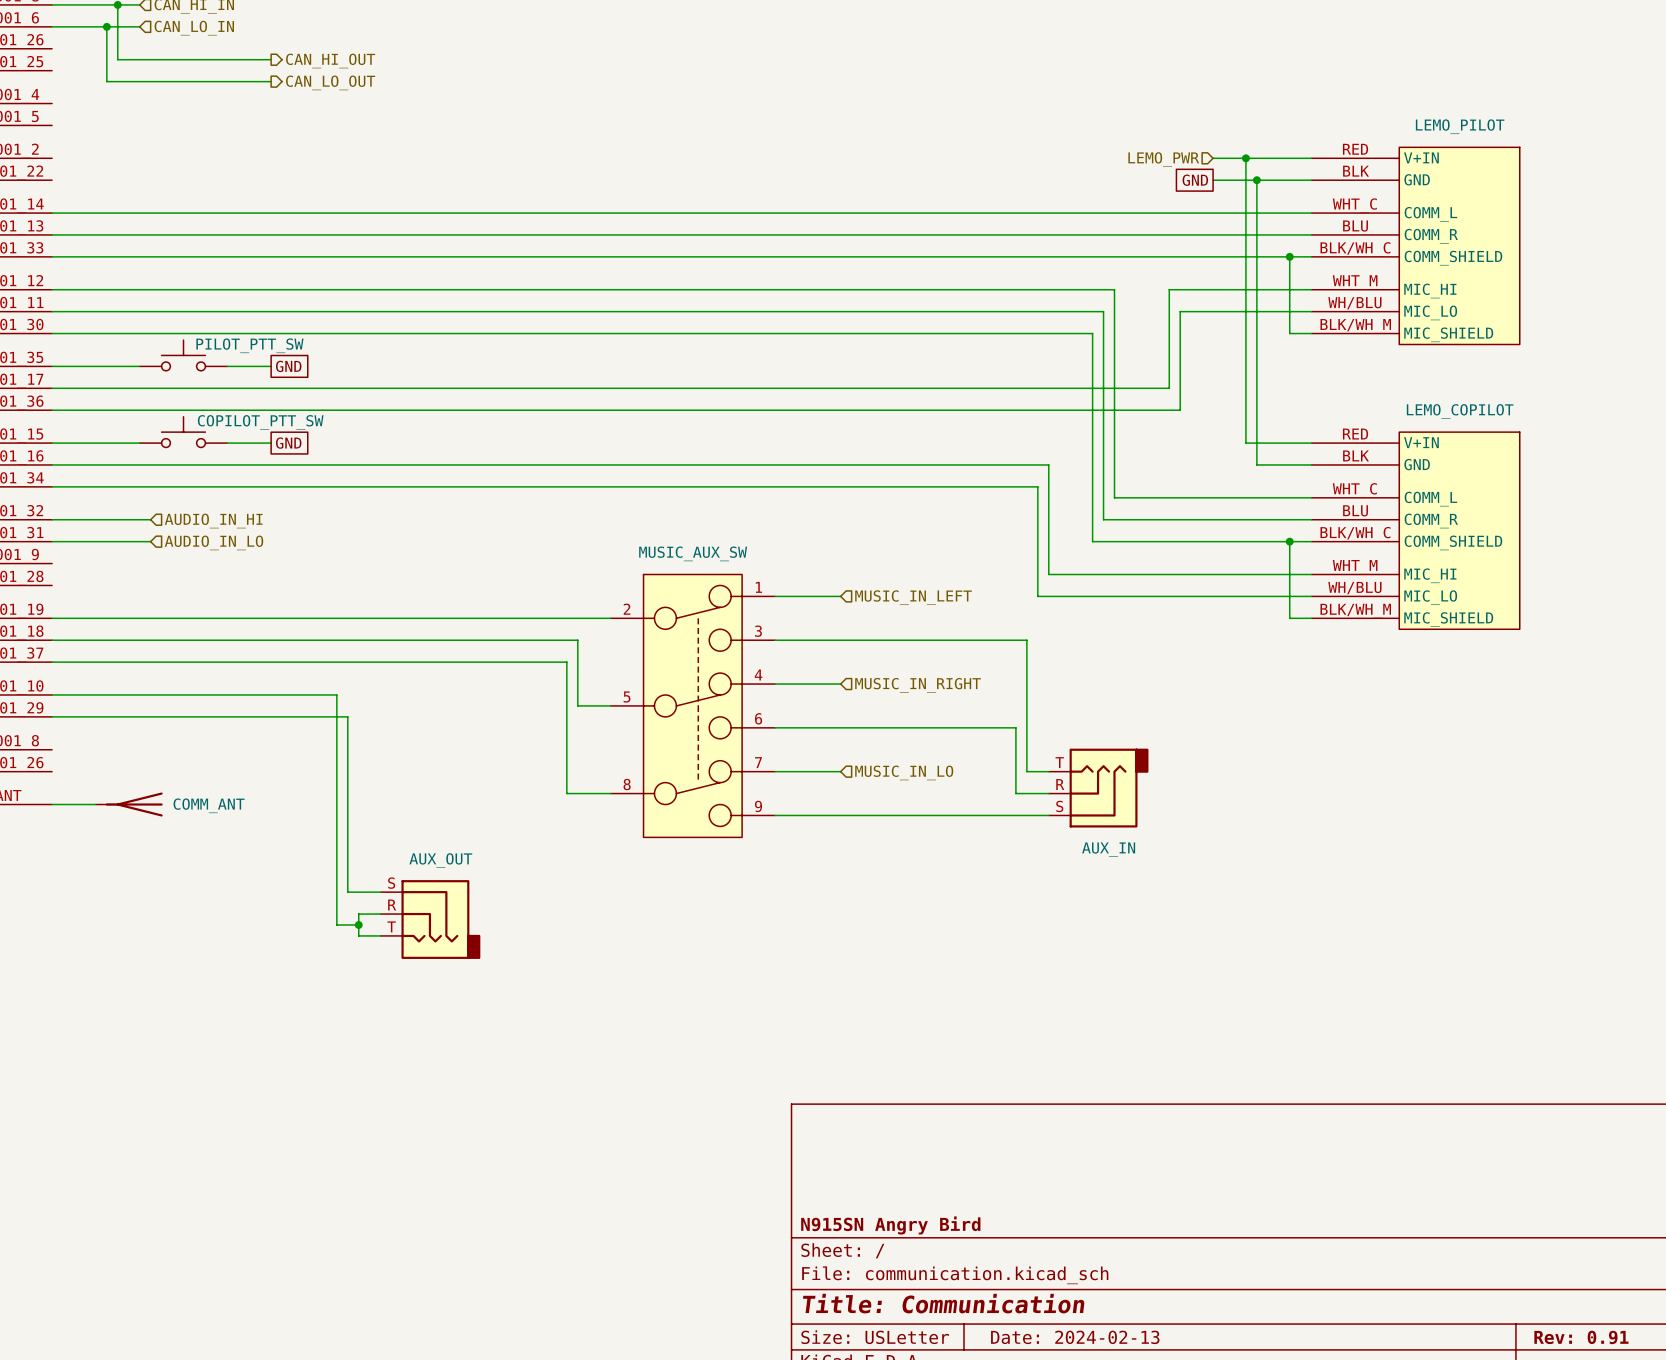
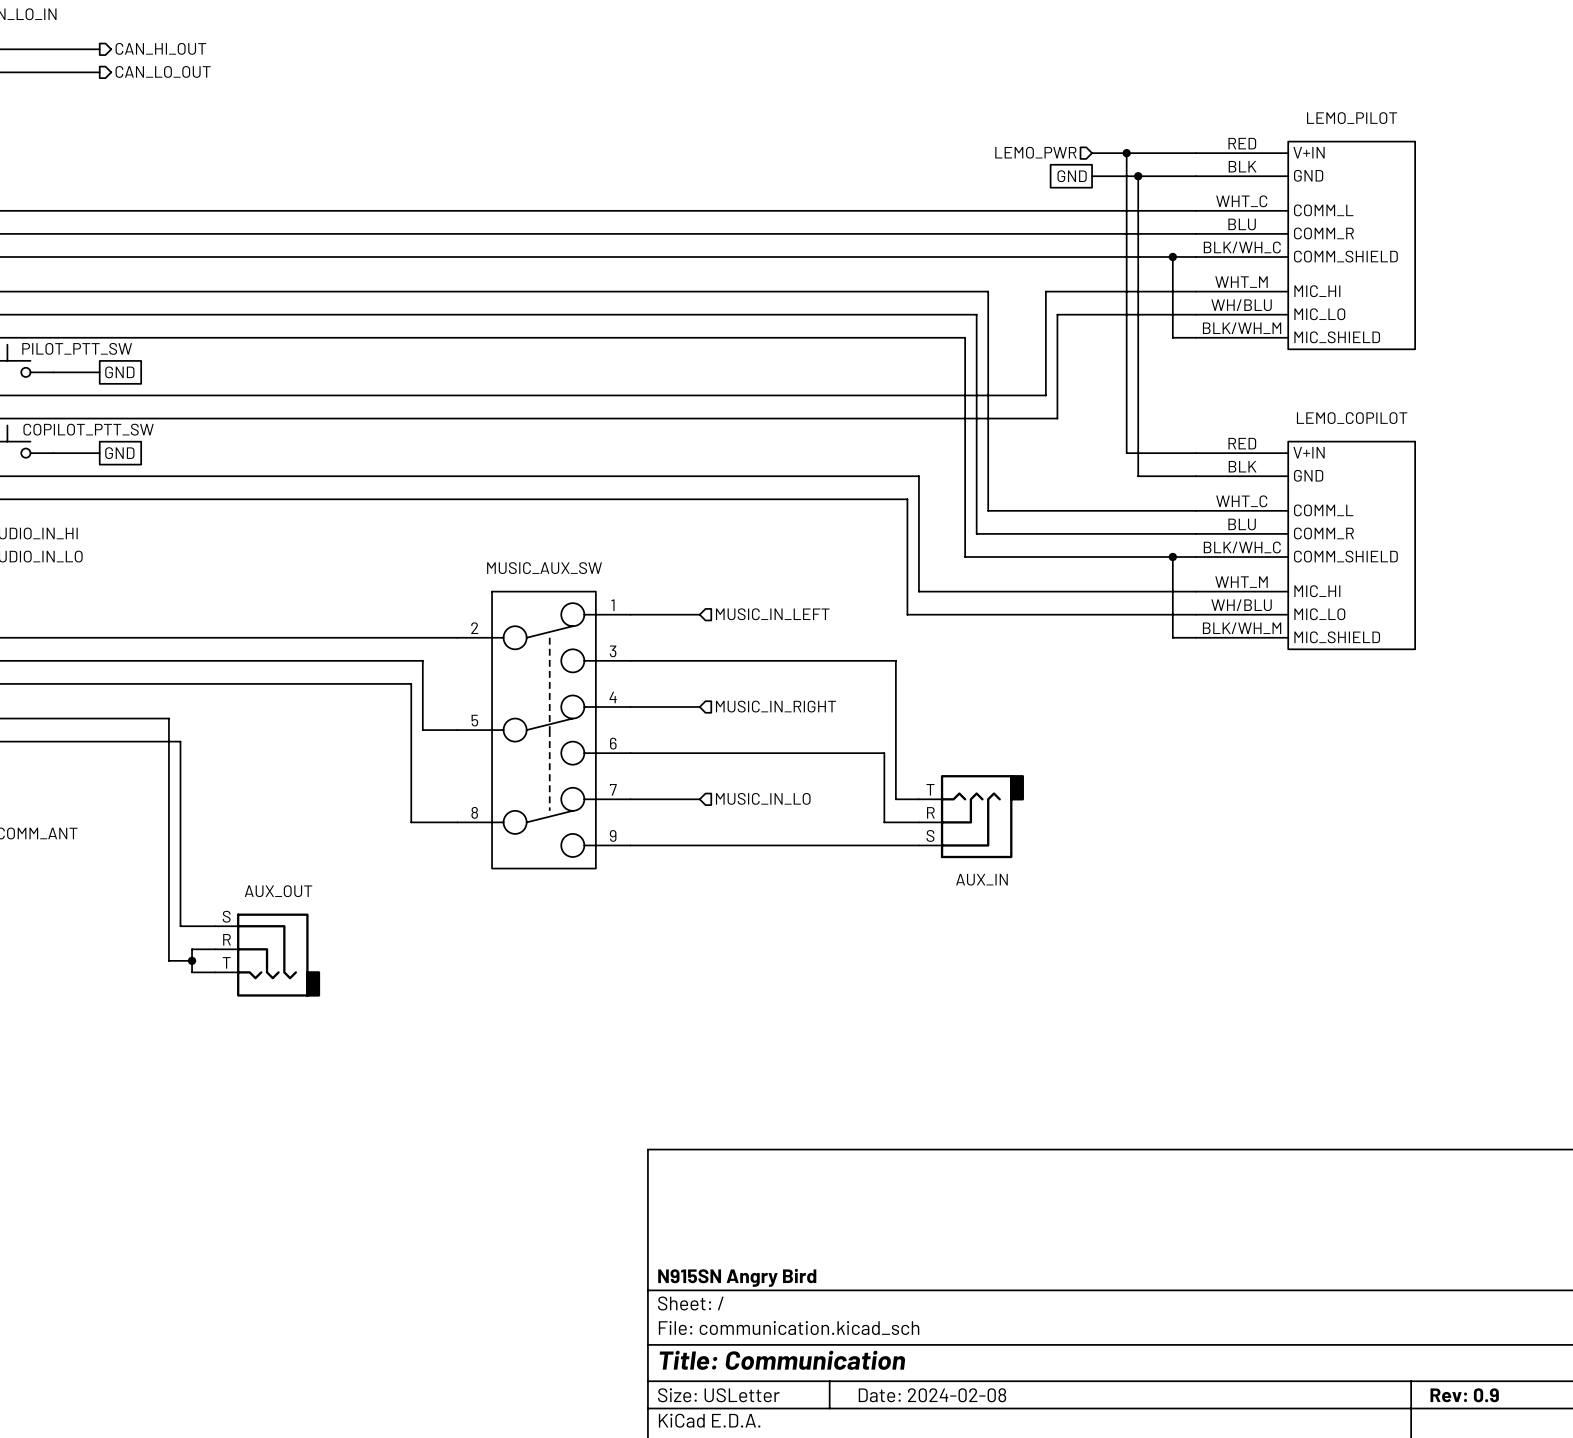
title block: Date: 2024-02-13 (1075, 1337) -> Date: 2024-02-08 (932, 1395)
title block: Rev: 0.91 (1581, 1337) -> Rev: 0.9 (1464, 1395)

